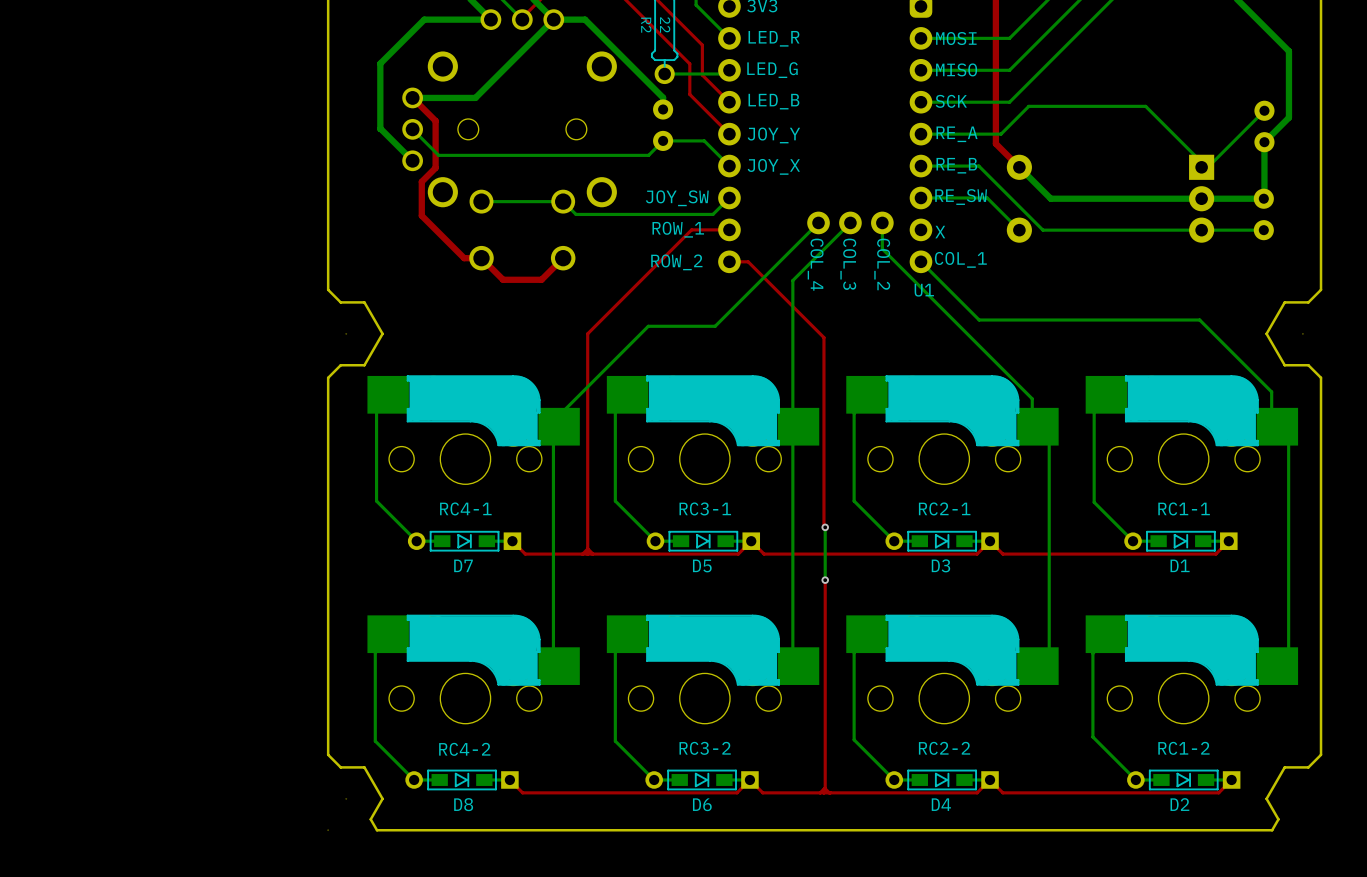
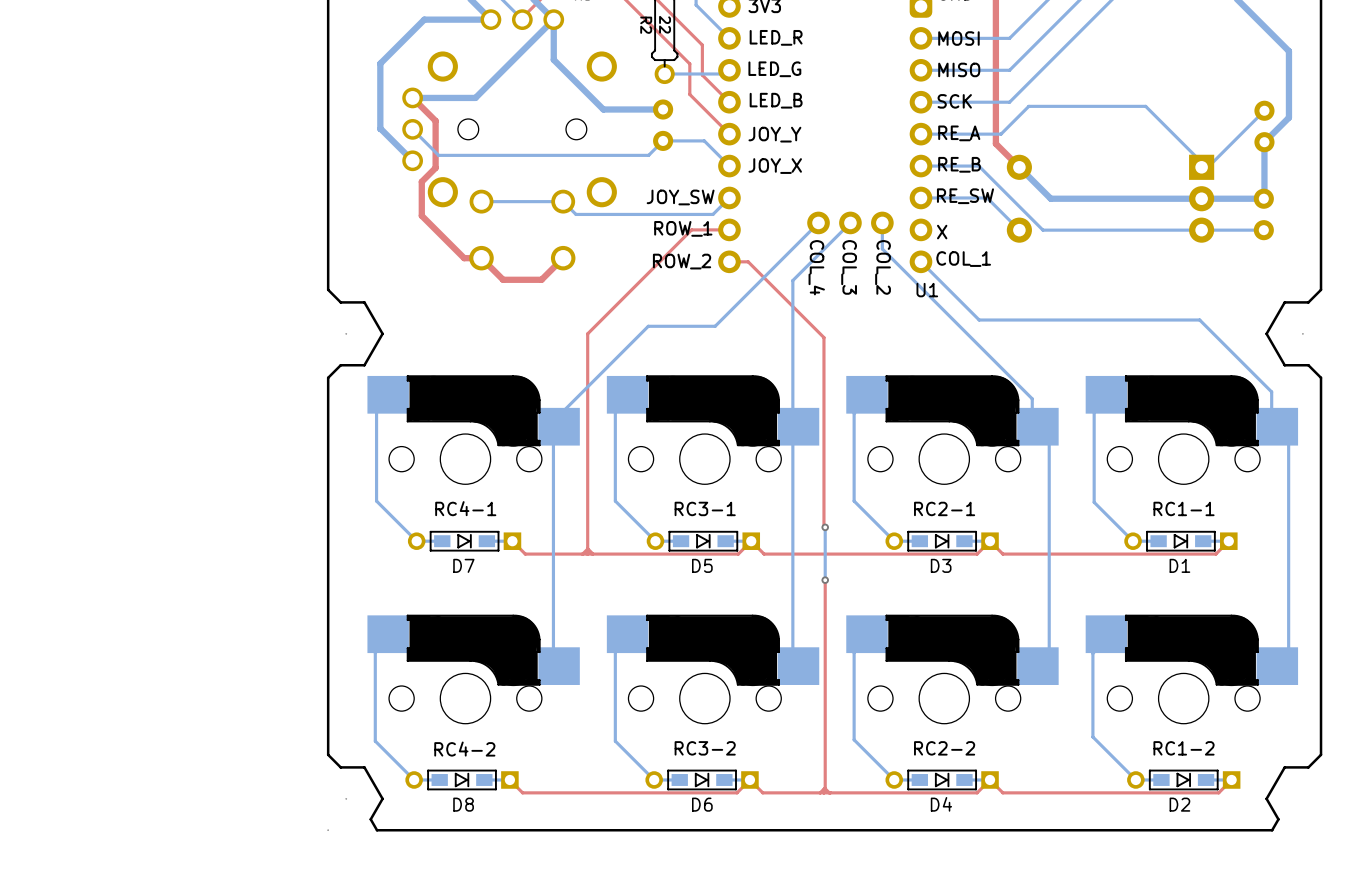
bottom track: (553, 19) (585, 19) (663, 97) (663, 109) -> (553, 19) (553, 59) (603, 109) (663, 109)

